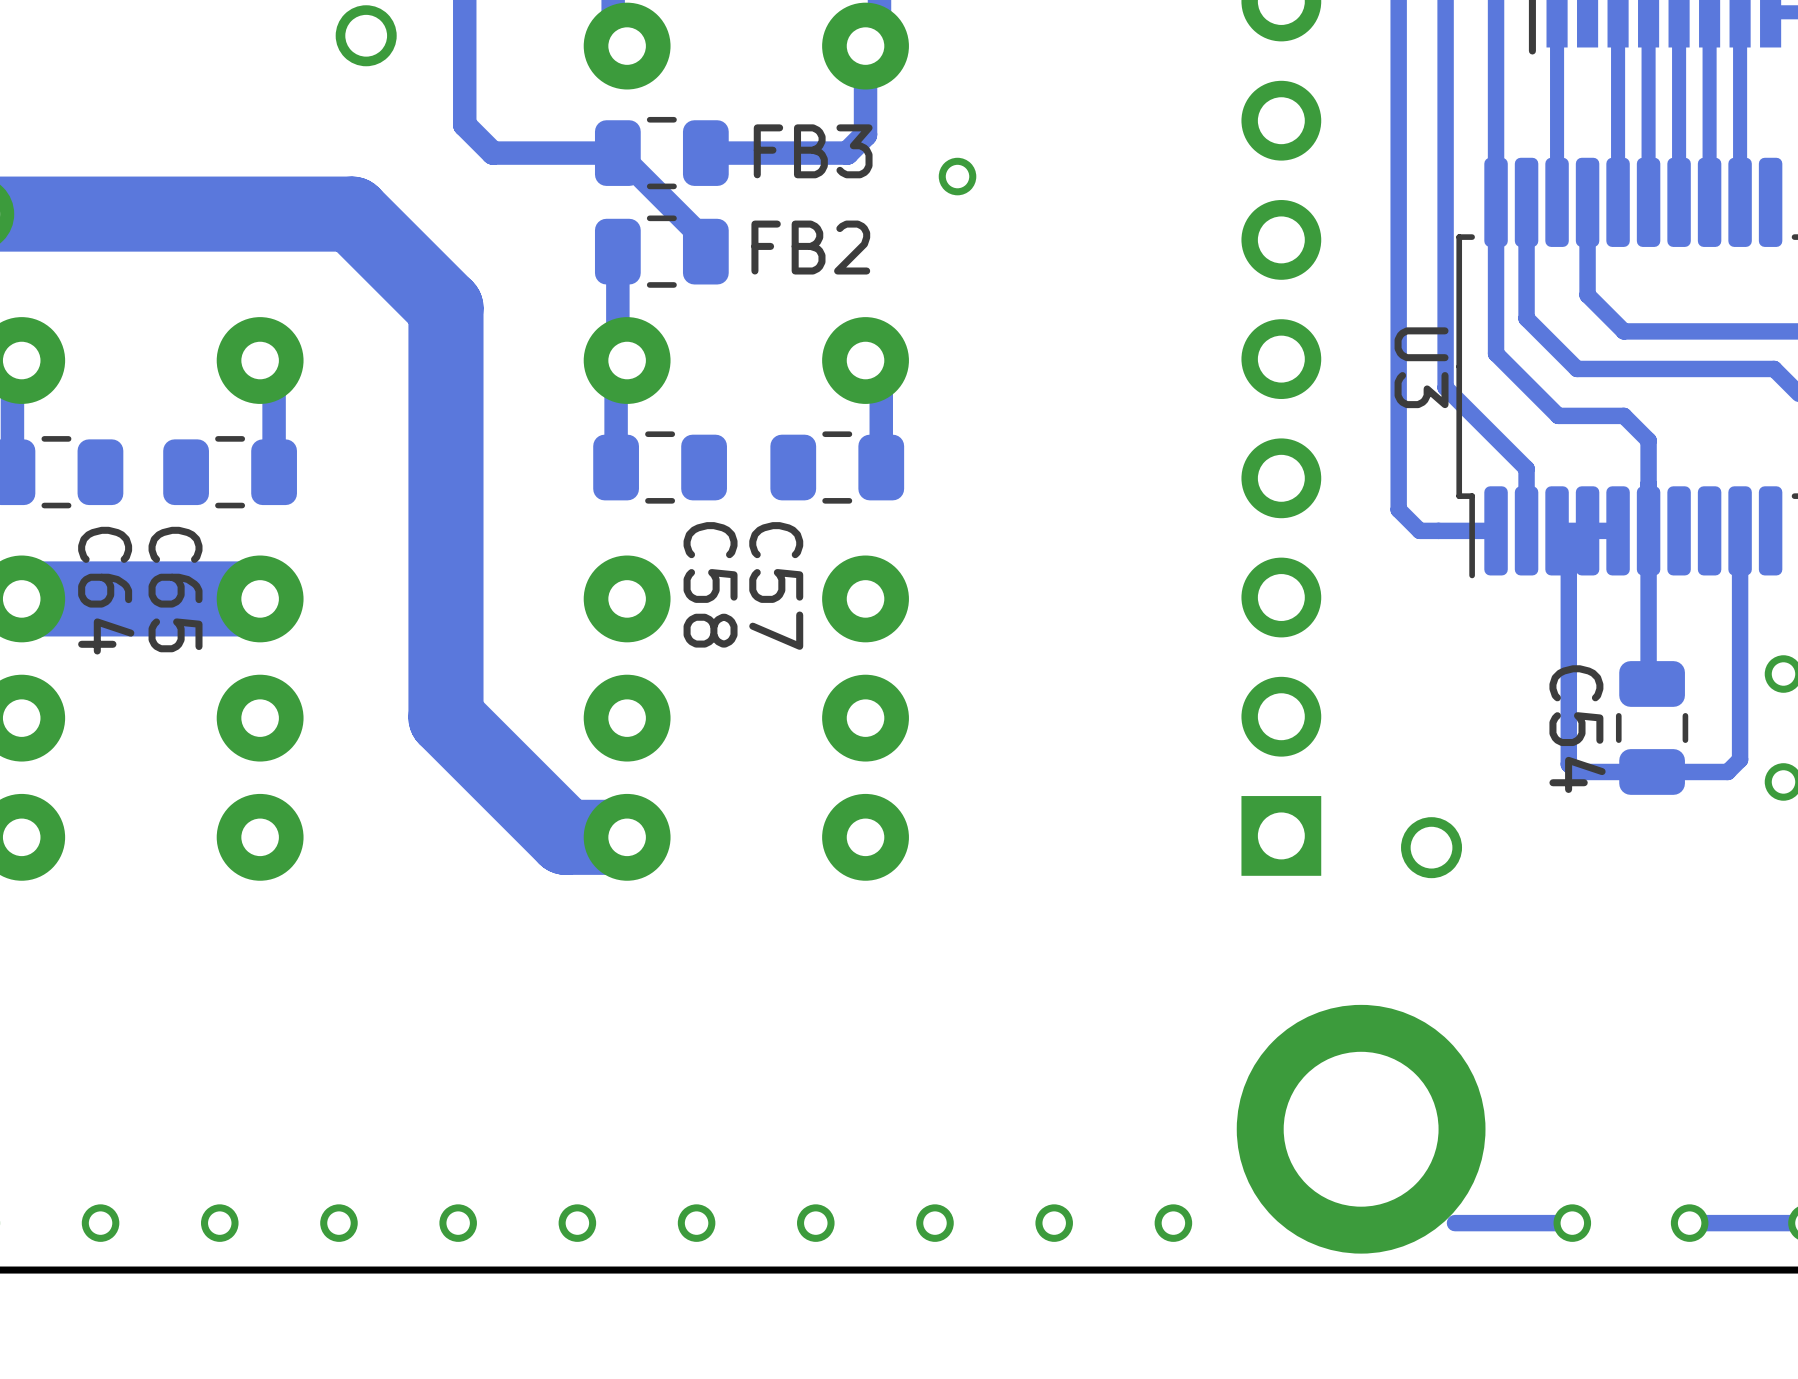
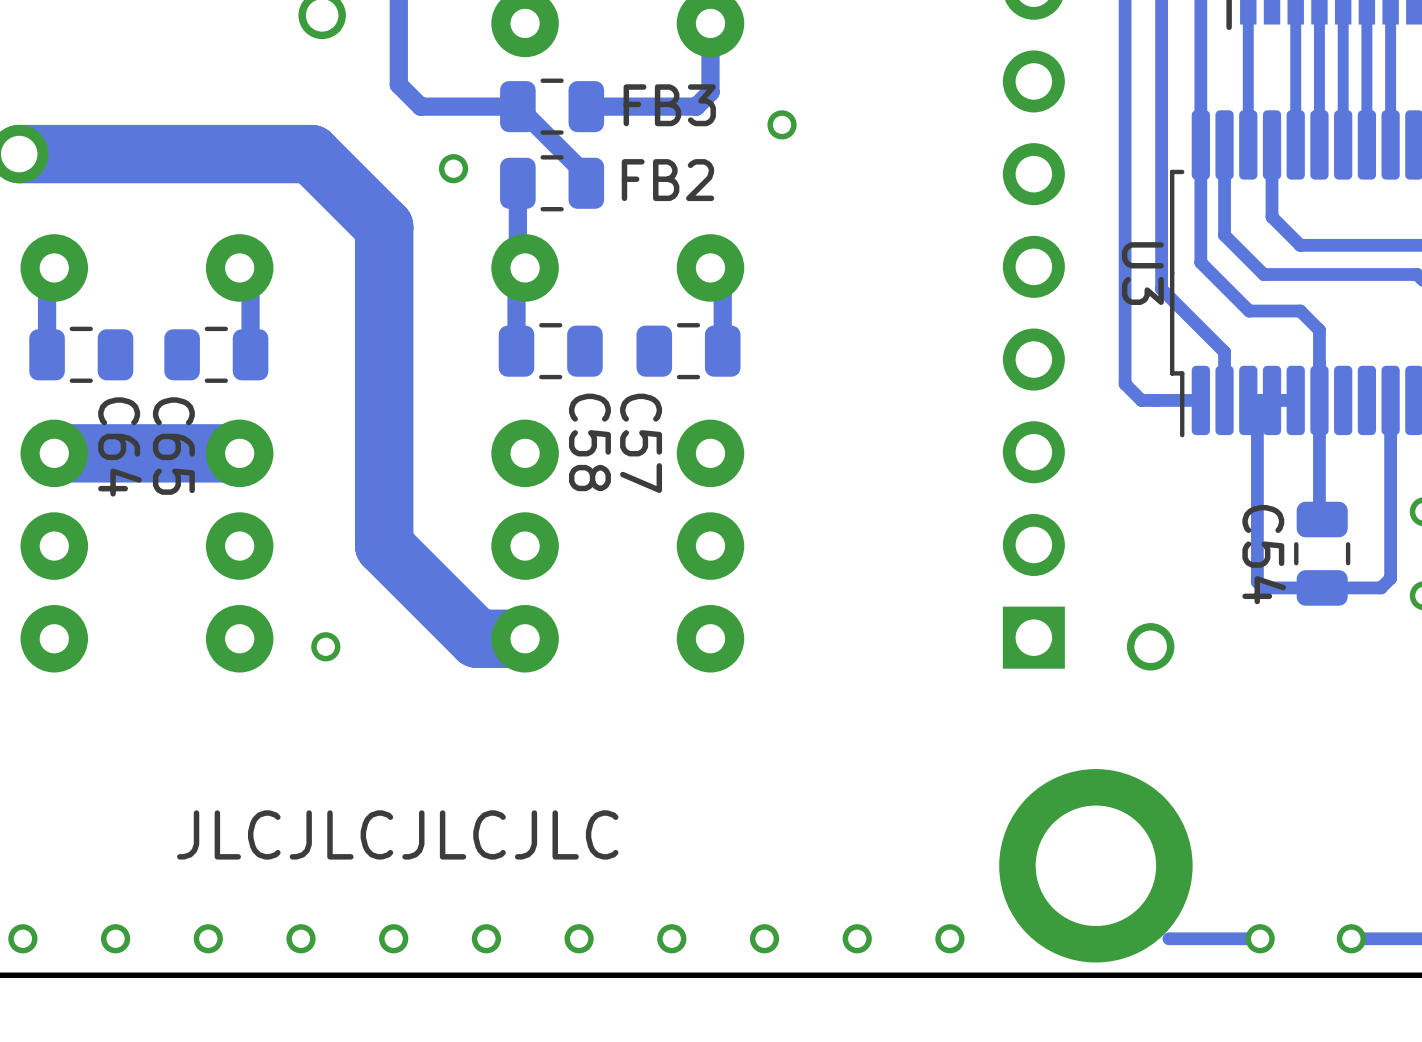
via: none -> (453, 168)
via: none -> (325, 646)
text: none -> JLCJLCJLCJLC (397, 834)

